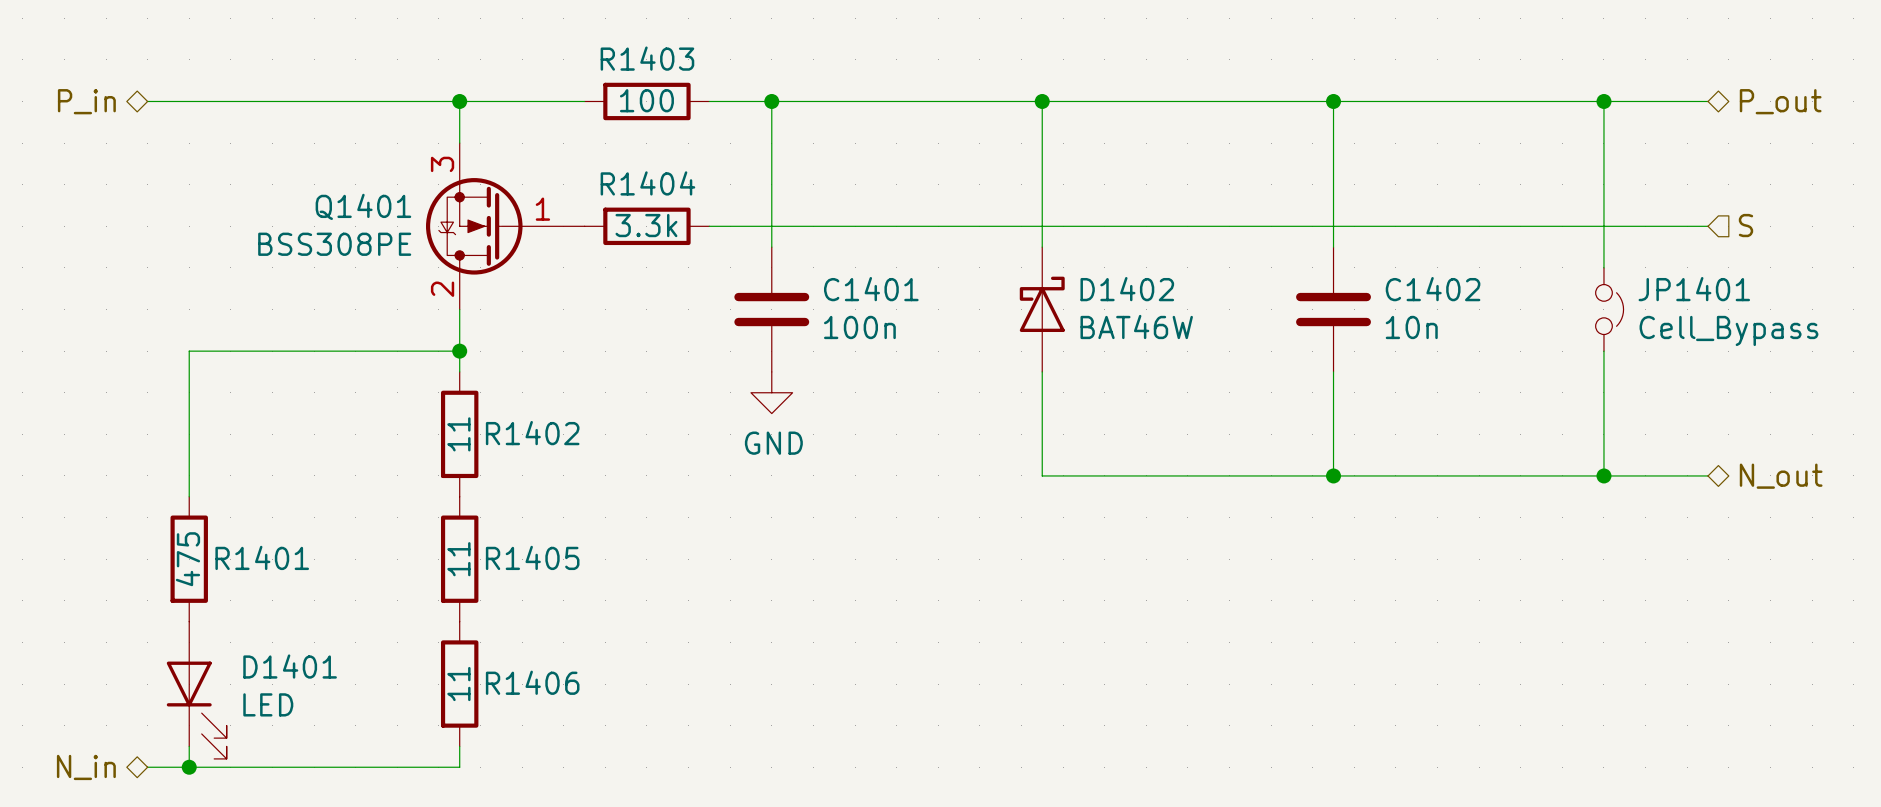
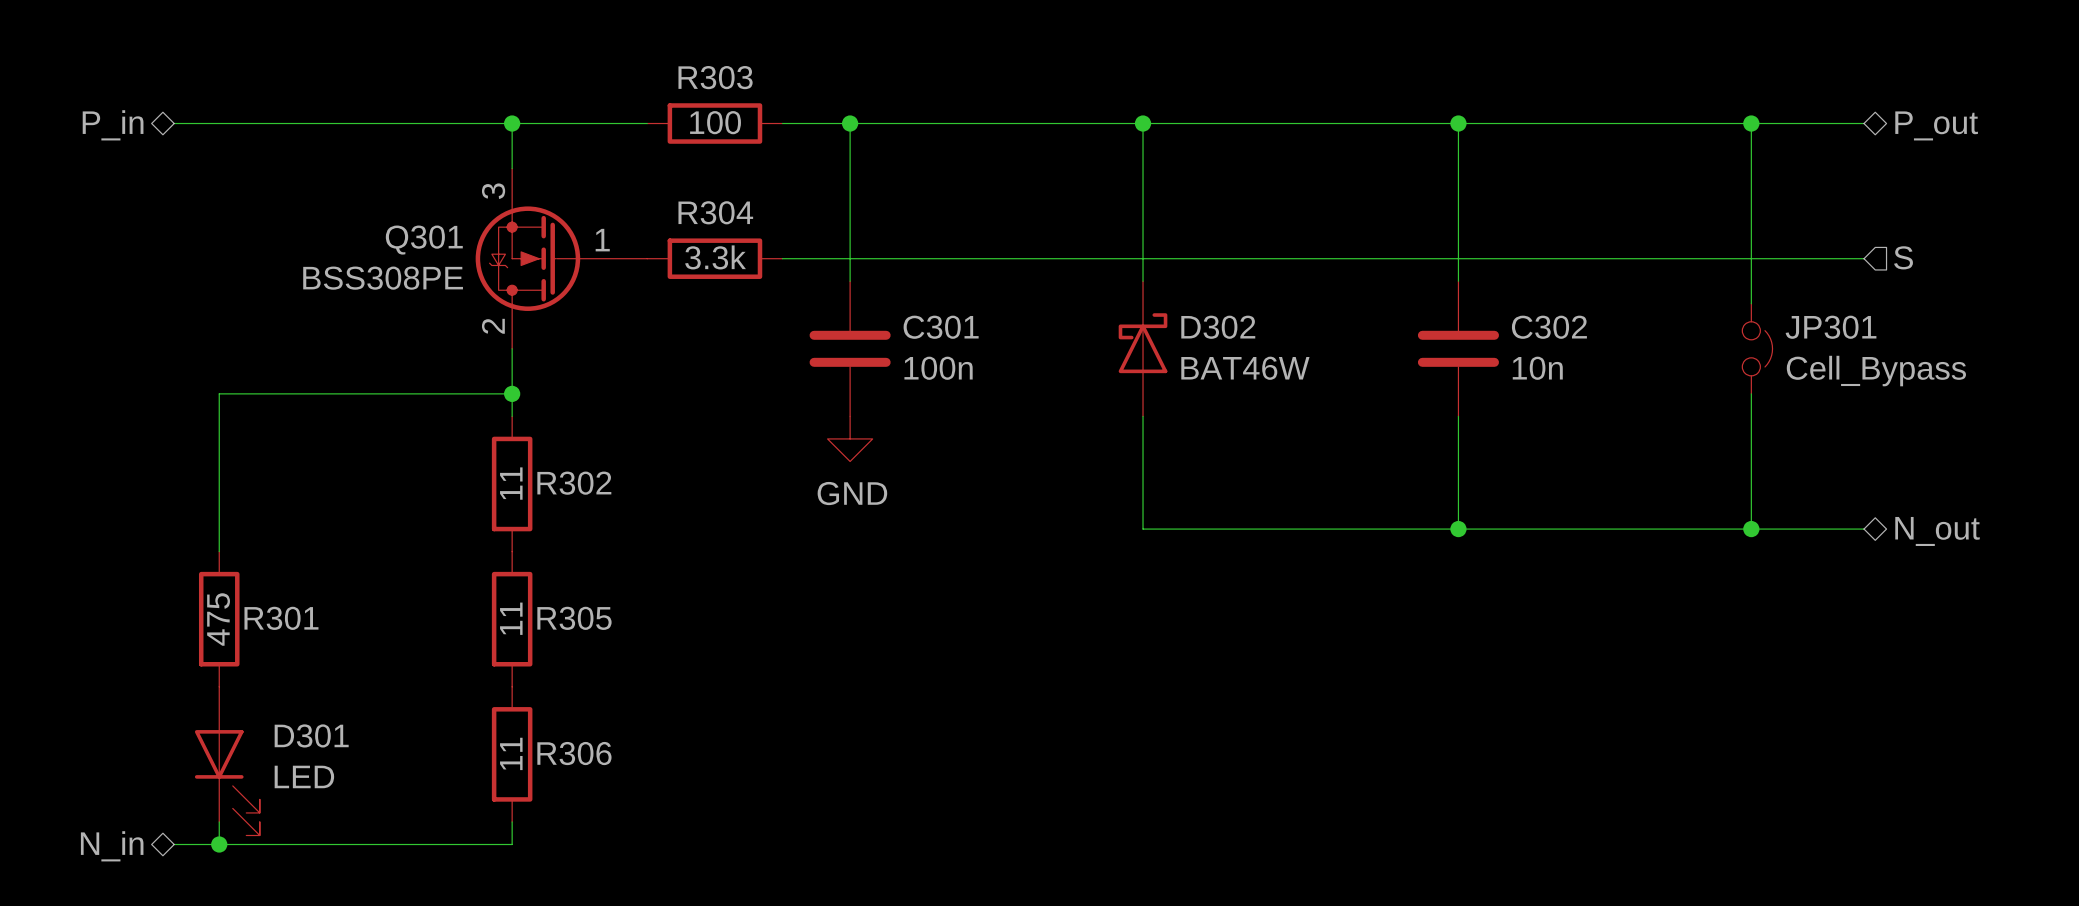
R1403 name: R1403 (647, 58) -> R303 (715, 77)
R1404 name: R1404 (647, 183) -> R304 (715, 212)
Q1401 name: Q1401 (363, 206) -> Q301 (424, 240)
C1401 name: C1401 (871, 289) -> C301 (941, 327)
D1402 name: D1402 (1127, 289) -> D302 (1218, 327)
C1402 name: C1402 (1433, 289) -> C302 (1549, 327)
JP1401 name: JP1401 (1694, 289) -> JP301 (1831, 327)
R1402 name: R1402 (532, 433) -> R302 (574, 483)
R1401 name: R1401 (262, 557) -> R301 (281, 618)
R1405 name: R1405 (532, 557) -> R305 (574, 618)
D1401 name: D1401 (290, 666) -> D301 (311, 735)
R1406 name: R1406 (532, 682) -> R306 (574, 753)

